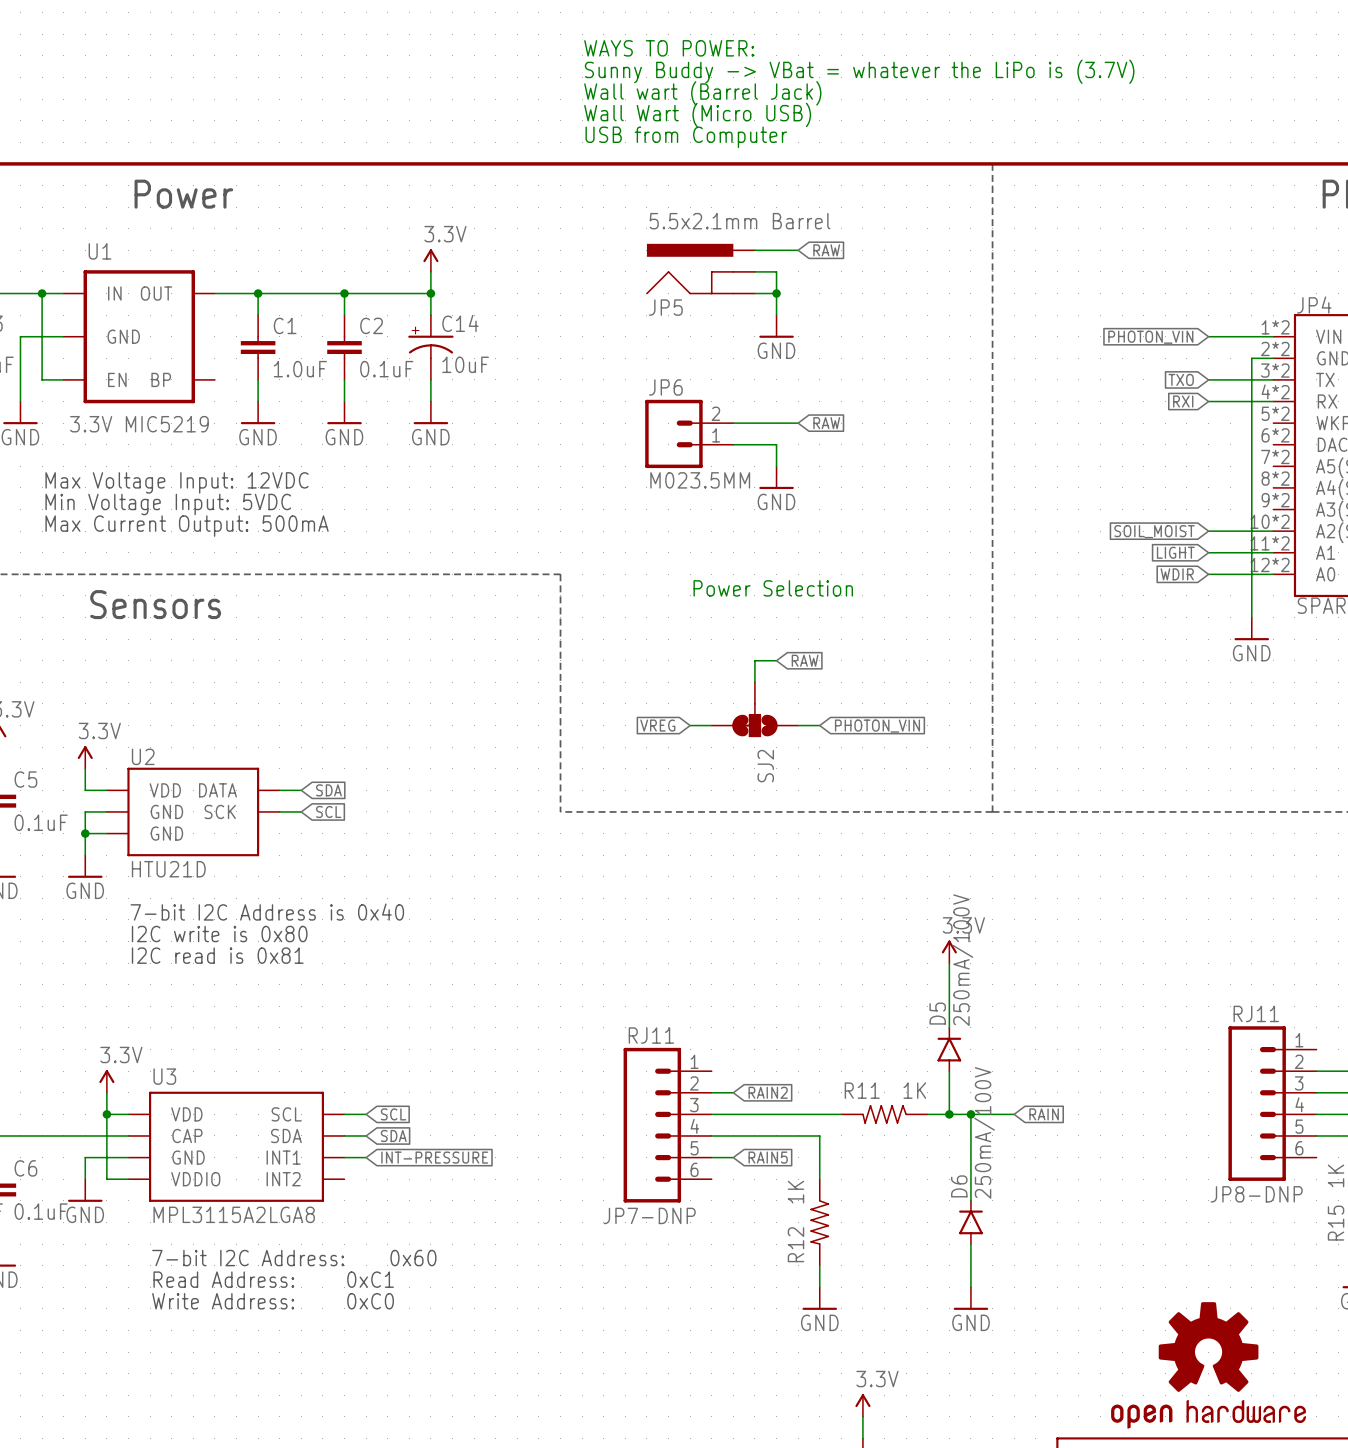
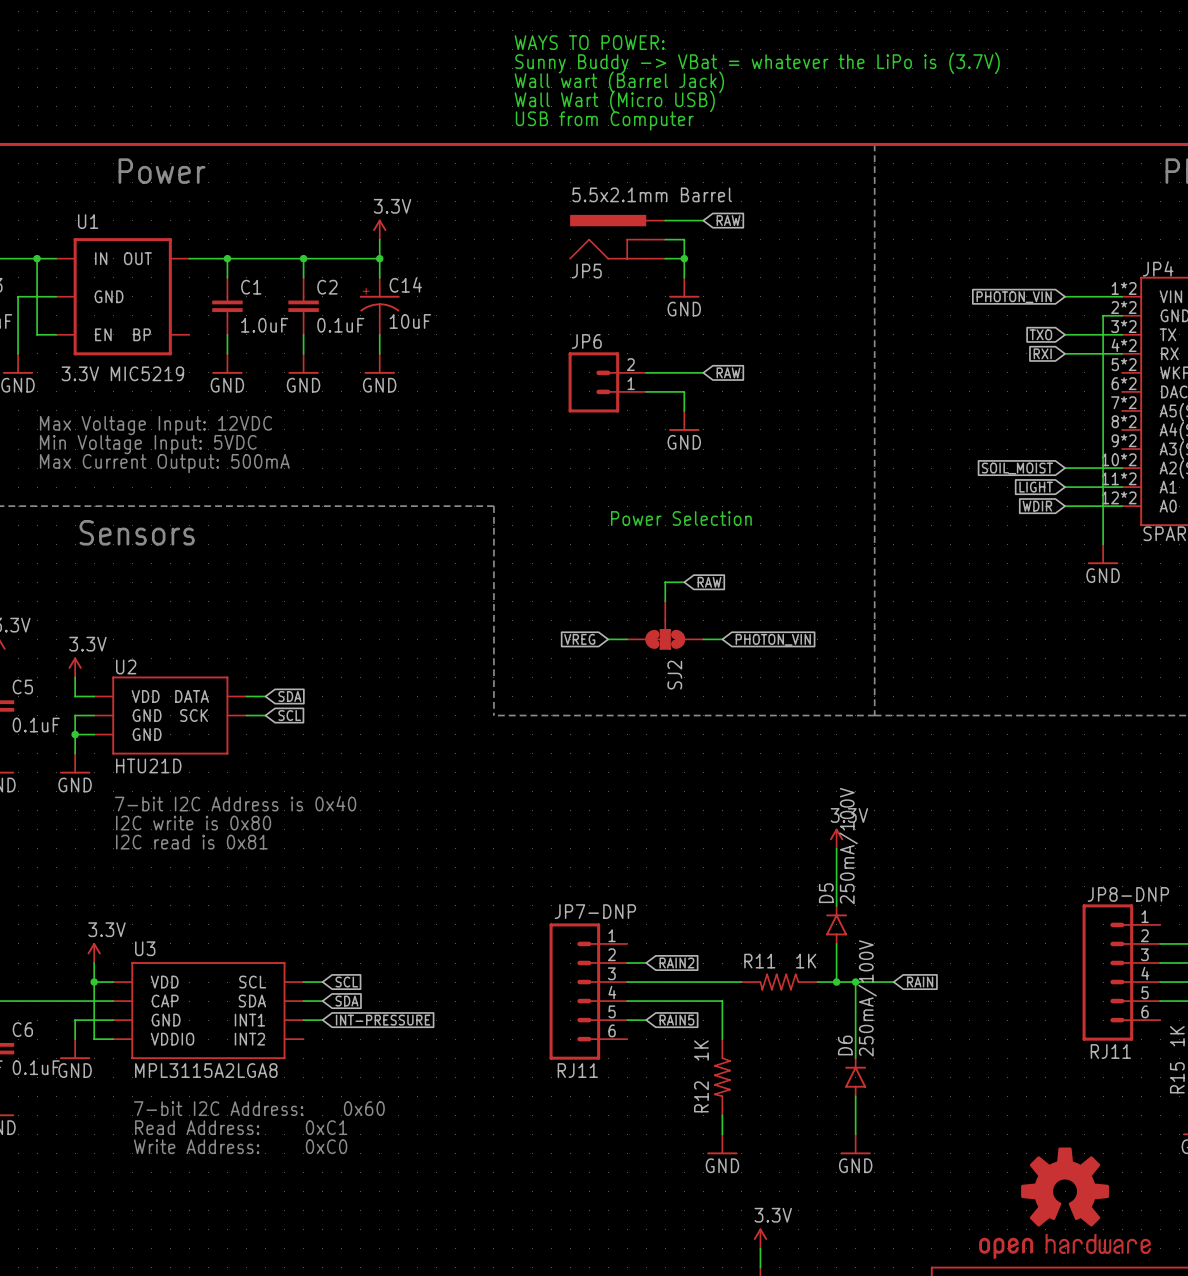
JP6 value: M023.5MM (700, 480) -> none
JP8-DNP value position: RJ11 (1256, 1013) -> RJ11 (1110, 1051)
JP7-DNP value position: RJ11 (651, 1035) -> RJ11 (577, 1070)
JP8-DNP name position: JP8-DNP (1256, 1194) -> JP8-DNP (1128, 894)
JP7-DNP name position: JP7-DNP (649, 1215) -> JP7-DNP (595, 911)

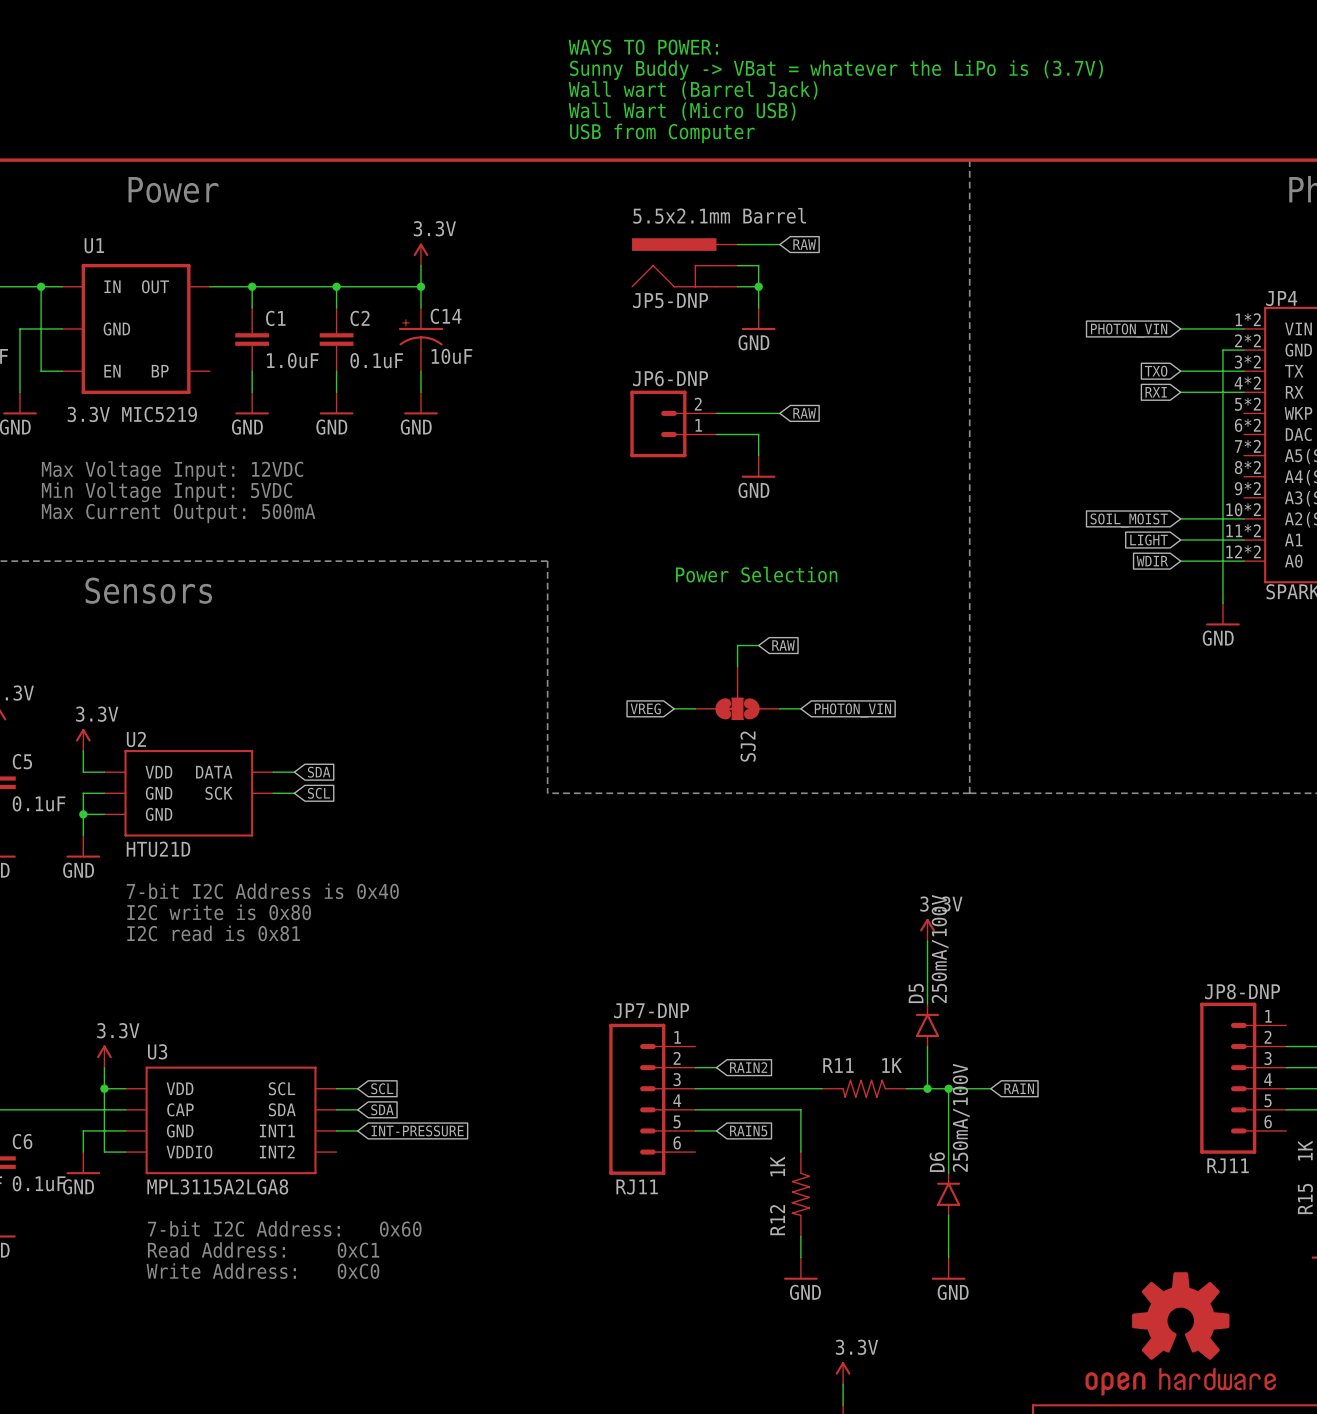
JP5 name: JP5 (586, 271) -> JP5-DNP (670, 300)
JP6 name: JP6 (586, 341) -> JP6-DNP (670, 378)

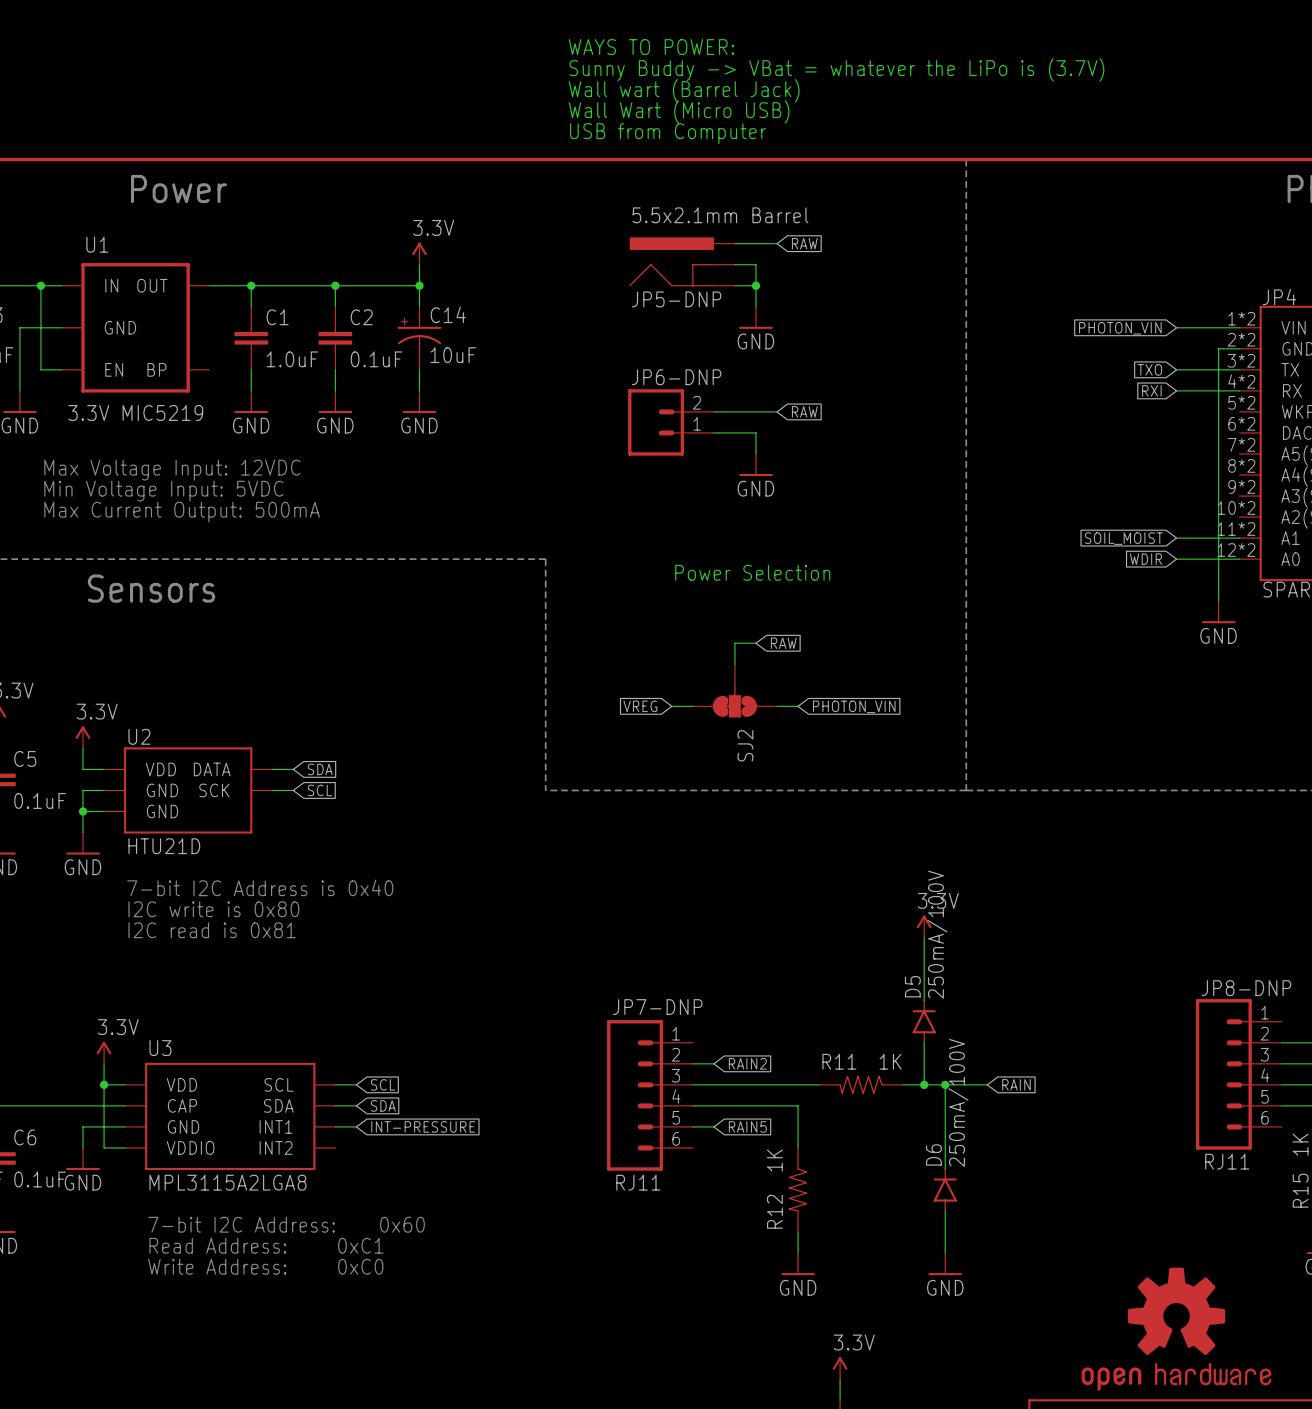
wire: (1180, 518) (1244, 518) -> none
global label: SOIL_MOIST (1129, 520) -> none
global label: LIGHT (1149, 540) -> SOIL_MOIST (1123, 538)

